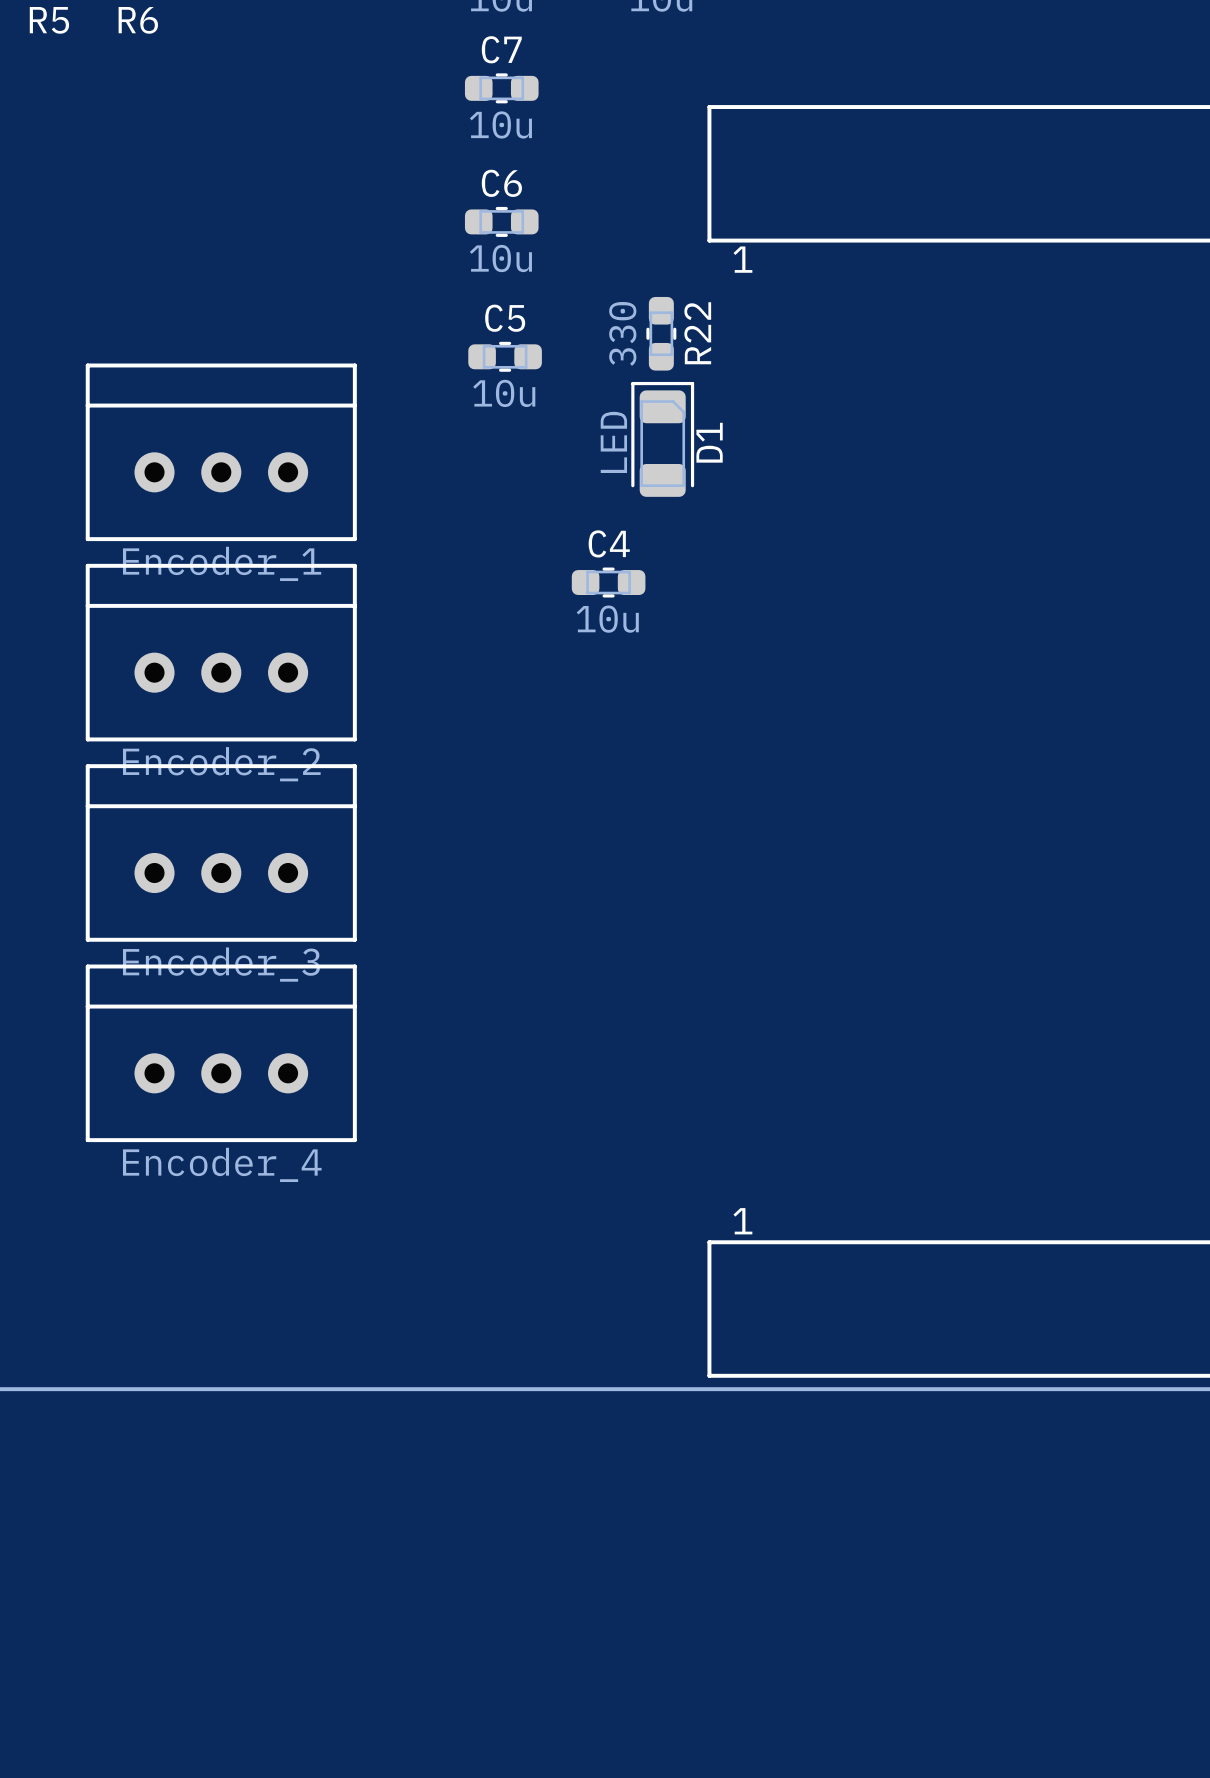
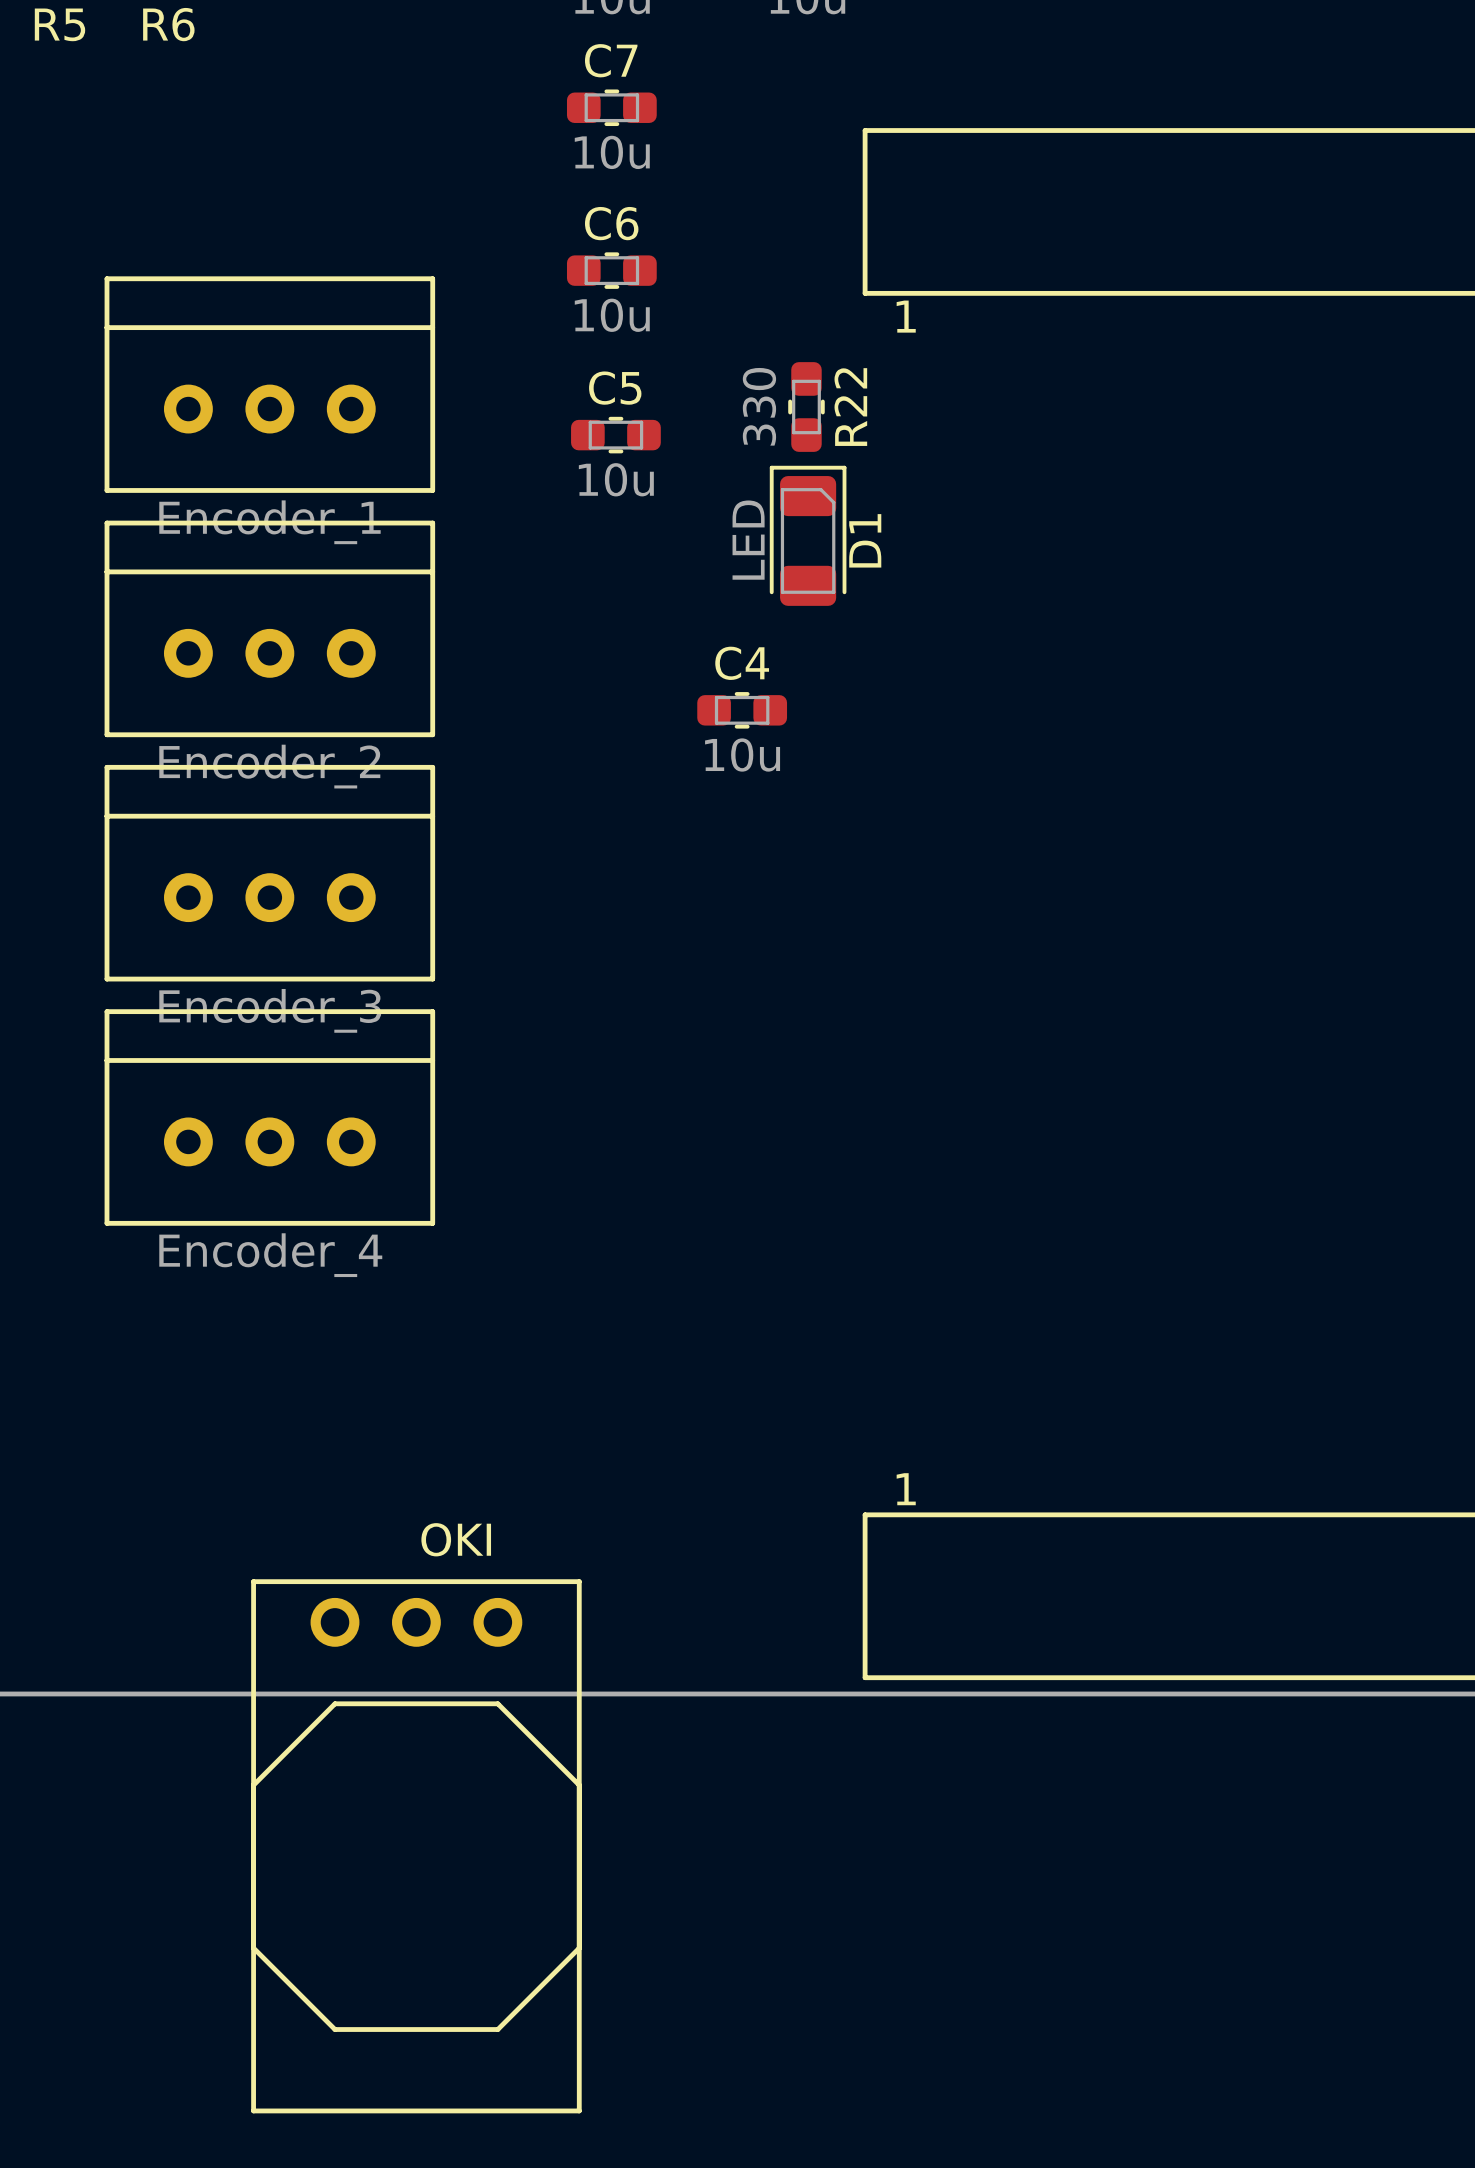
part position: (221, 452) -> (269, 384)
part position: (221, 652) -> (269, 628)
part position: (221, 852) -> (269, 873)
part position: (221, 1053) -> (269, 1117)
part: none -> OKI (416, 1846)

